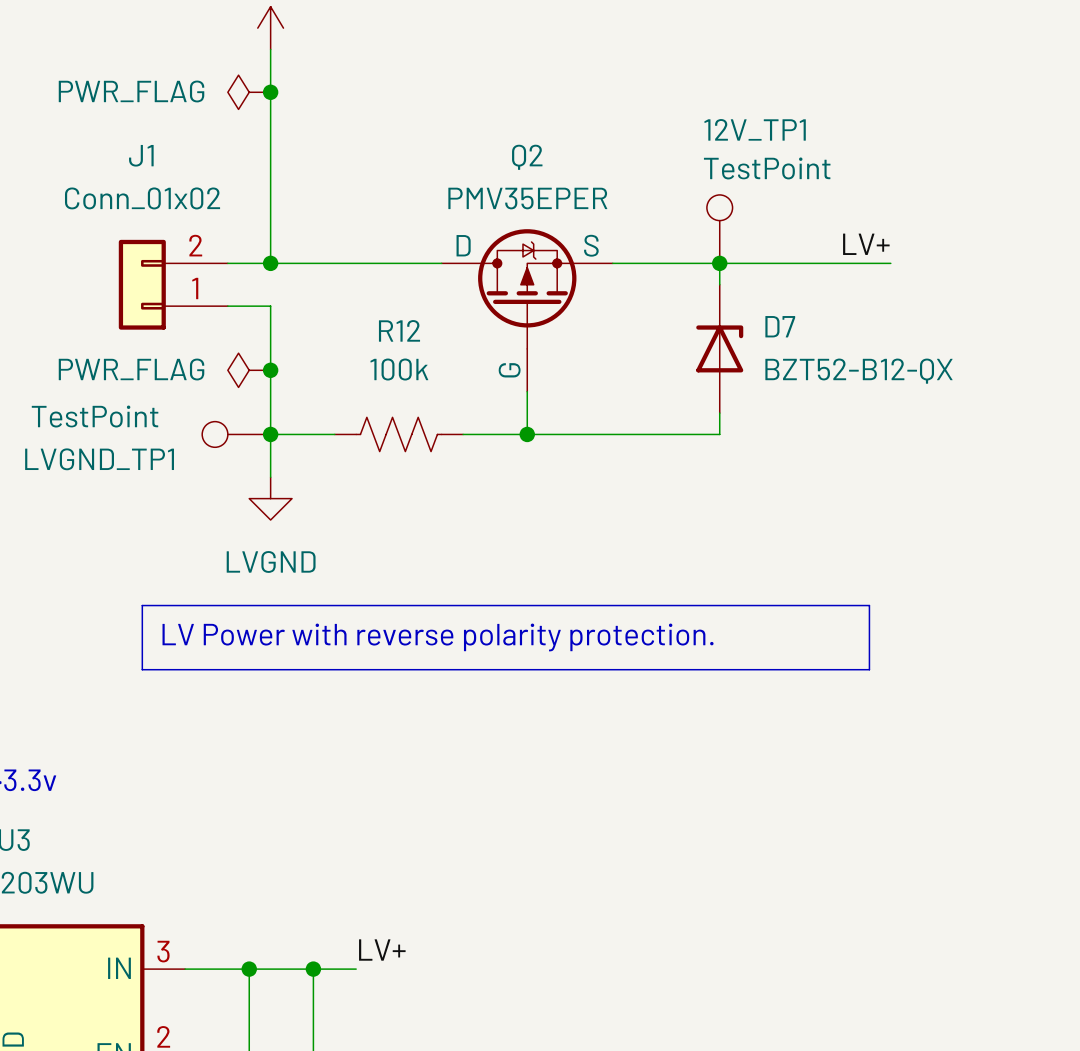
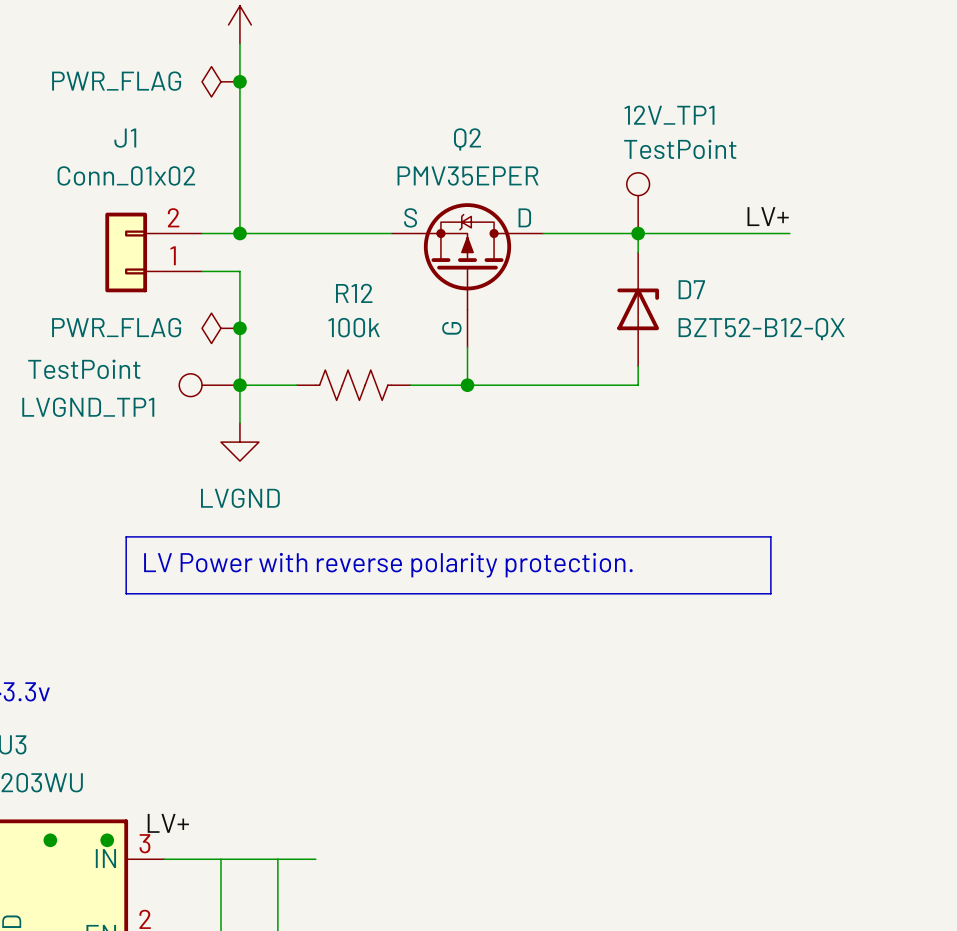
Q2 flip: as is (527, 289) -> left-right (467, 256)
junction: none -> (50, 840)
junction: none -> (107, 840)
label position: LV+ (382, 950) -> LV+ (168, 823)
junction: (249, 969) -> none
junction: (313, 969) -> none

